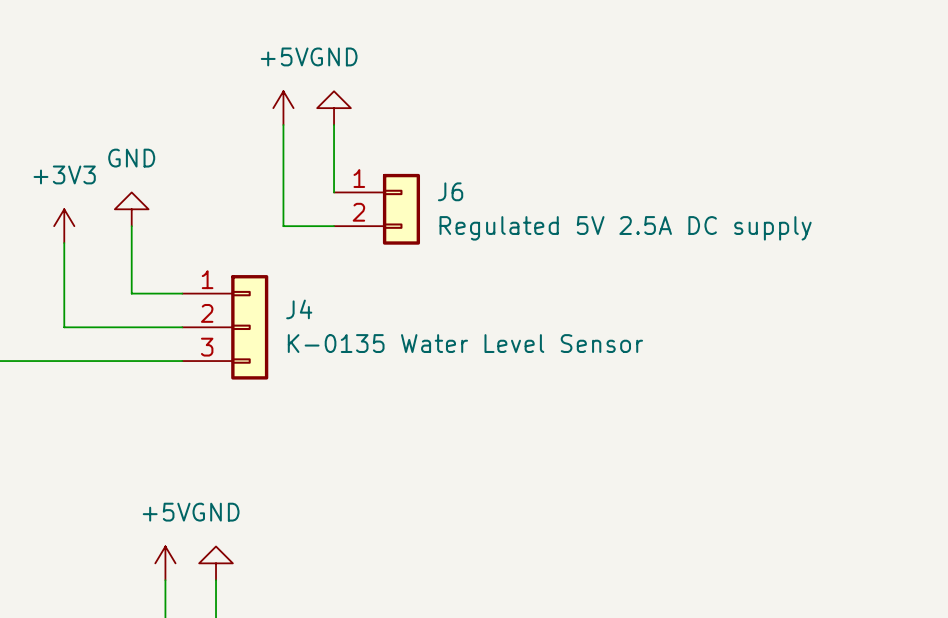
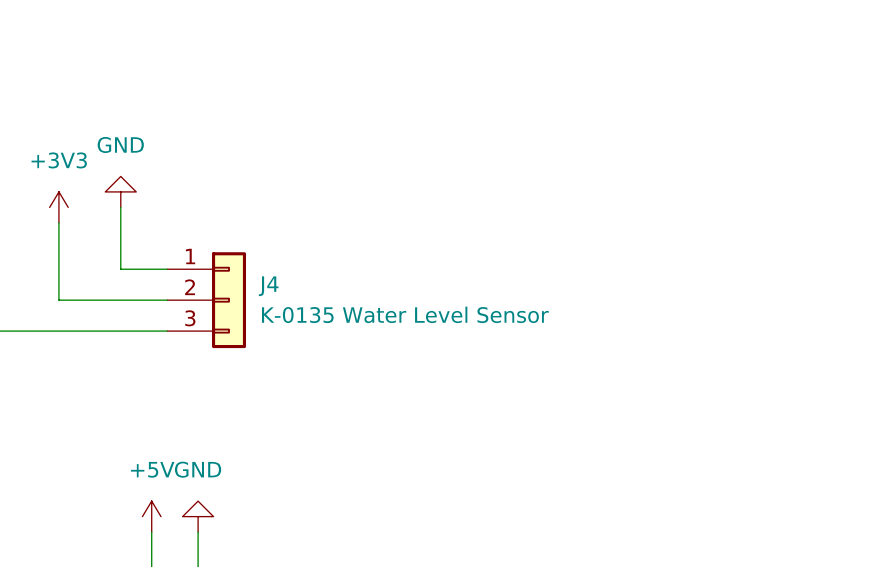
power symbol: +5V (283, 108) -> none
power symbol: GND (334, 108) -> none
wire: (283, 125) (283, 226) (334, 226) -> none
wire: (334, 125) (334, 192) -> none
J6: Regulated 5V 2.5A DC supply (377, 209) -> none

